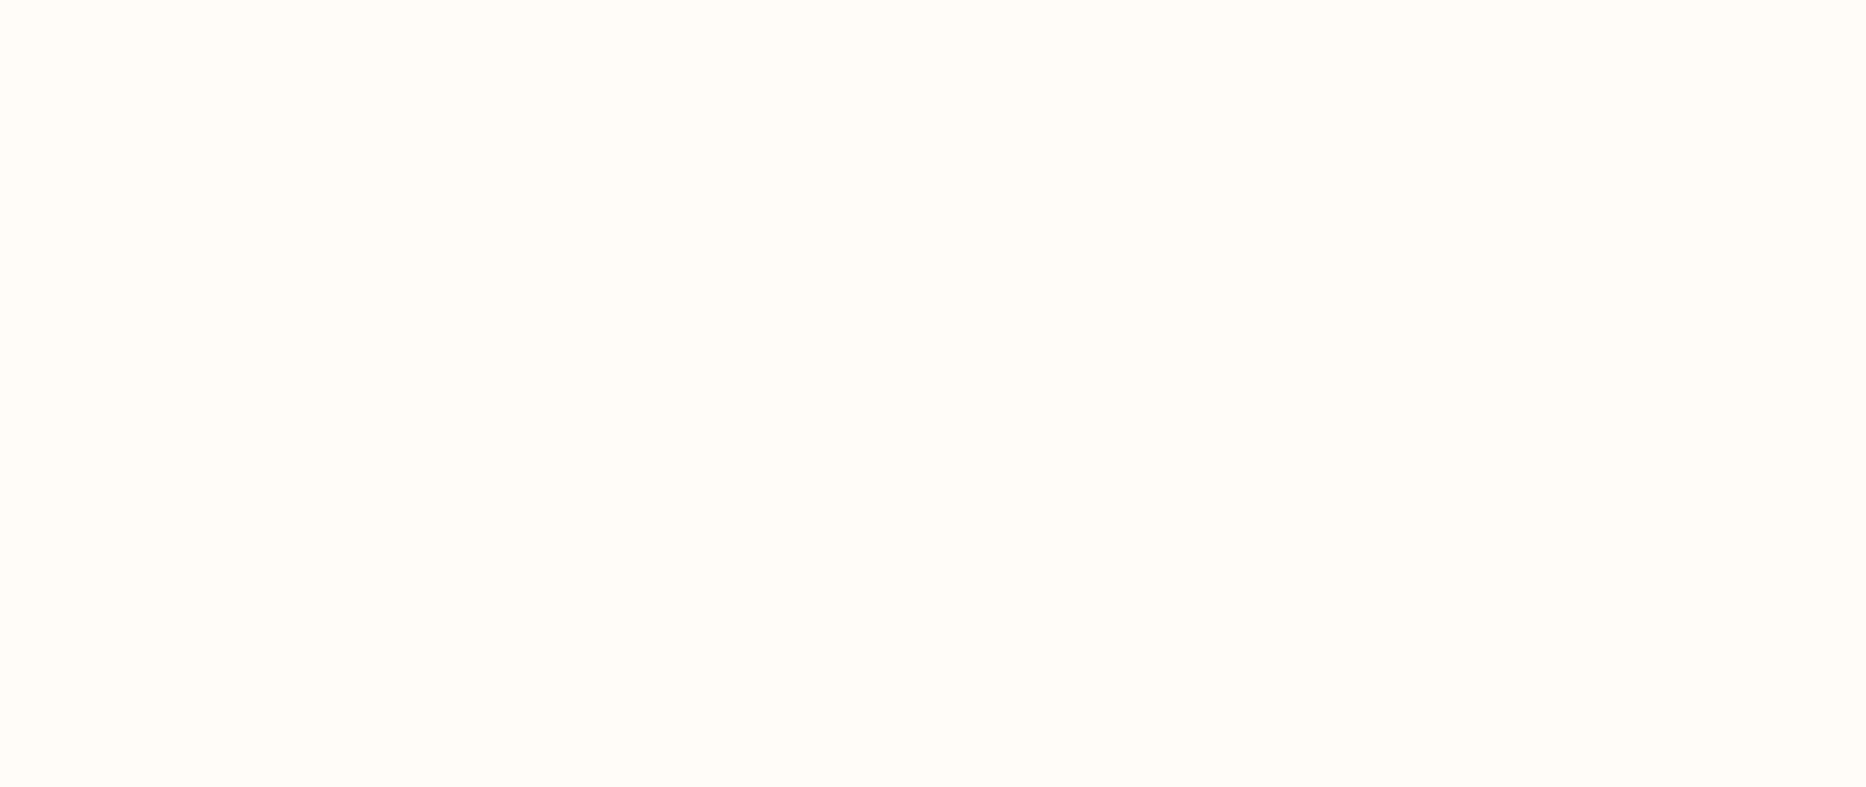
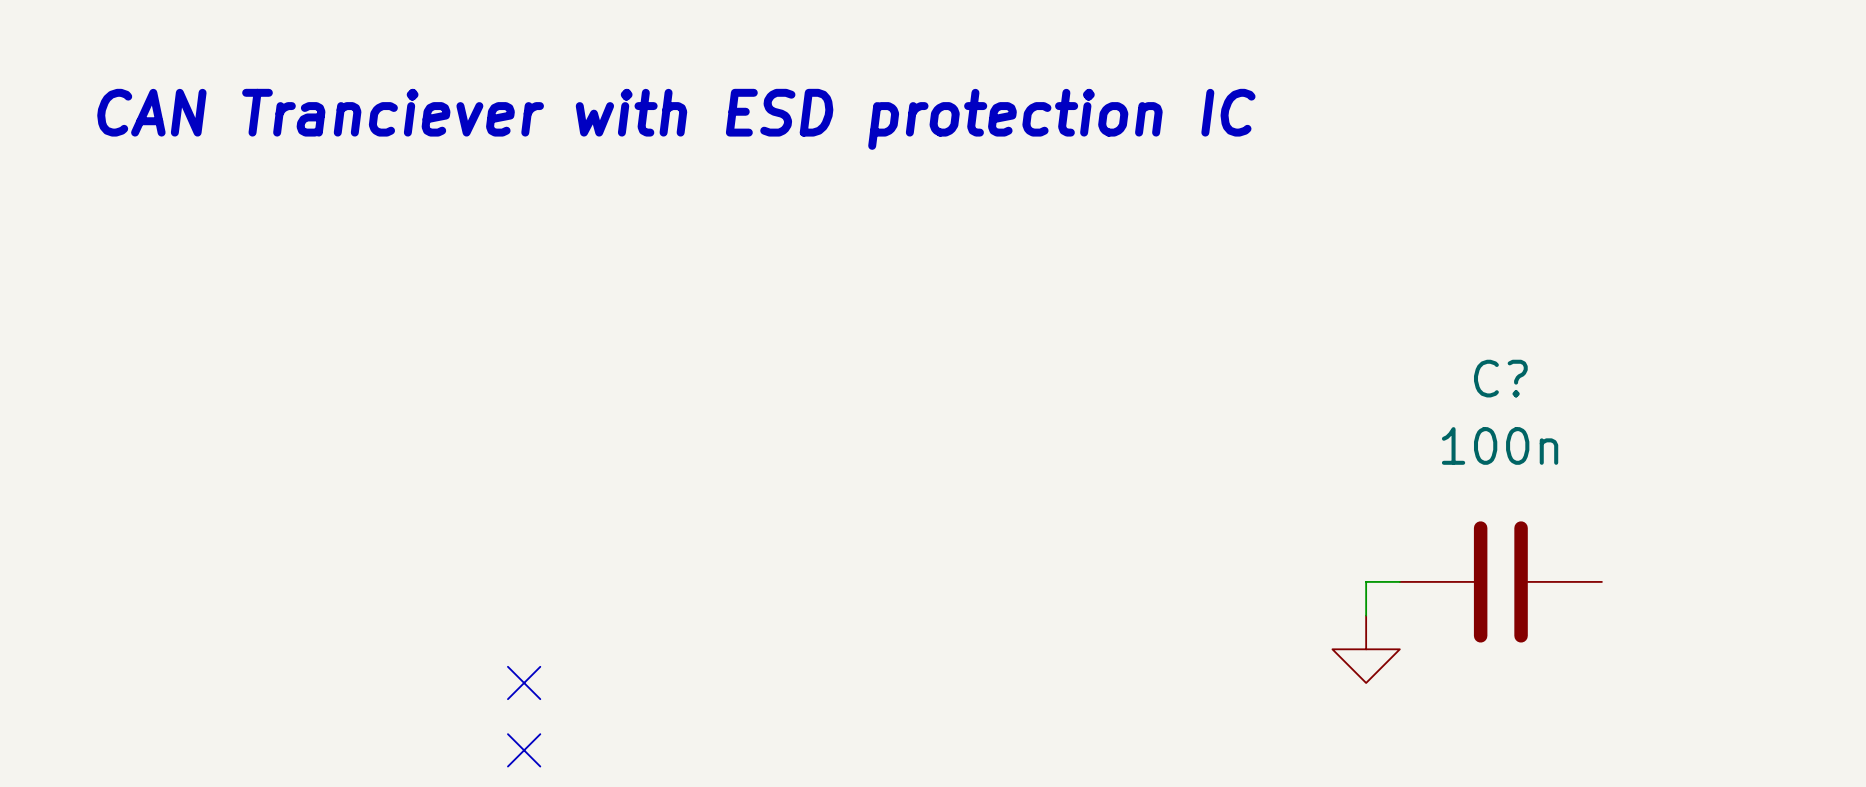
text: none -> CAN Tranciever with ESD protection IC (676, 119)
wire: none -> (1399, 581) (1366, 581) (1366, 615)
C?: none -> 100n (1500, 581)
power symbol: none -> (1366, 649)
no-connect mark: none -> (524, 682)
no-connect mark: none -> (524, 750)

